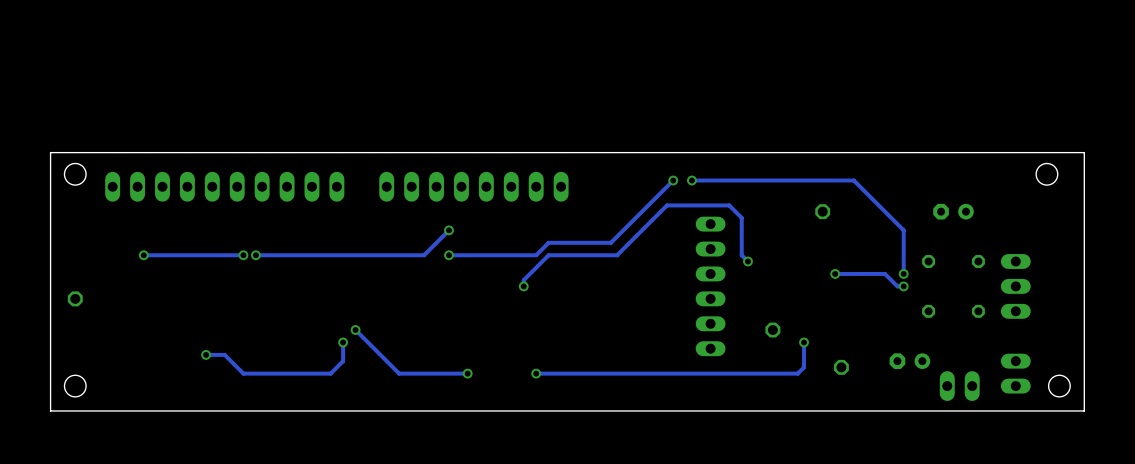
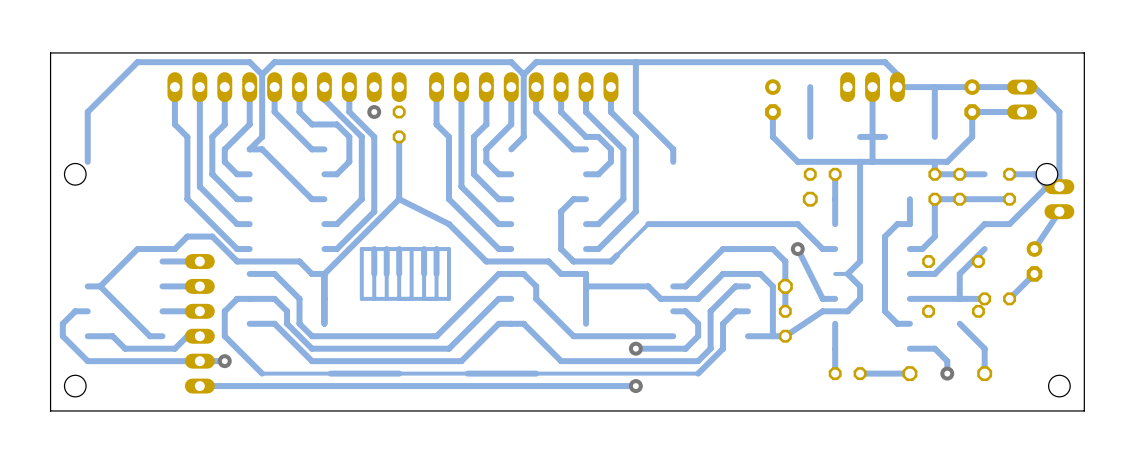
track: none -> (635, 62) (635, 112) (673, 149) (673, 161)
track: none -> (262, 74) (262, 136) (249, 149) (262, 149) (311, 199) (324, 199)
track: none -> (262, 74) (249, 62) (137, 62) (87, 112) (87, 161)
track: none -> (523, 74) (536, 62) (885, 62) (897, 74) (897, 87) (1034, 87) (1059, 112) (1059, 186) (1046, 186)
track: none -> (523, 74) (523, 136) (511, 149)
track: none -> (523, 74) (511, 62) (274, 62) (262, 74)
track: none -> (174, 87) (174, 124) (187, 136) (187, 199) (237, 249) (249, 249)
track: none -> (199, 87) (199, 186) (237, 224) (249, 224)
track: none -> (224, 87) (224, 124) (212, 136) (212, 174) (237, 199) (249, 199)
track: none -> (249, 87) (249, 124) (224, 149) (224, 161) (237, 174) (249, 174)
track: none -> (274, 87) (274, 112) (311, 149) (324, 149)
track: none -> (299, 87) (299, 112) (311, 124) (336, 124) (349, 136) (349, 161) (336, 174) (324, 174)
track: none -> (324, 87) (324, 99) (361, 136) (361, 199) (336, 224) (324, 224)
track: none -> (349, 87) (349, 112) (374, 136) (374, 211) (336, 249) (324, 249)
track: none -> (436, 87) (436, 124) (449, 136) (449, 199) (498, 249) (511, 249)
track: none -> (461, 87) (461, 186) (498, 224) (511, 224)
track: none -> (486, 87) (486, 124) (473, 136) (473, 174) (498, 199) (511, 199)
track: none -> (511, 87) (511, 124) (486, 149) (486, 161) (498, 174) (511, 174)
track: none -> (536, 87) (536, 112) (573, 149) (586, 149)
track: none -> (561, 87) (561, 112) (586, 136) (598, 136) (610, 149) (610, 161) (598, 174) (586, 174)
track: none -> (586, 87) (586, 112) (623, 149) (623, 199) (598, 224) (586, 224)
track: none -> (610, 87) (610, 112) (635, 136) (635, 211) (598, 249) (586, 249)
track: none -> (810, 87) (810, 136)
track: none -> (872, 87) (872, 161)
part: none -> (872, 87)
track: none -> (934, 87) (934, 136)
part: none -> (772, 99)
part: none -> (972, 99)
part: none -> (1022, 99)
via: none -> (374, 112)
track: none -> (1022, 112) (972, 112) (972, 136) (947, 161) (797, 161) (772, 136) (772, 112)
part: none -> (399, 124)
track: none -> (399, 136) (399, 199)
track: none -> (885, 136) (860, 136)
board edge: (1084, 152) (50, 152) -> (1084, 152) (1084, 52) (50, 52) (50, 152)
track: none -> (860, 161) (860, 261) (847, 273) (860, 286) (860, 298) (847, 311) (822, 311) (785, 336) (747, 336)
track: none -> (934, 161) (934, 174) (984, 174)
part: none -> (822, 174)
track: none -> (835, 174) (835, 224)
track: none -> (1009, 174) (1034, 174) (1046, 186)
track: (673, 180) (610, 242) (548, 242) (536, 255) (449, 255) -> none
via: (673, 180) -> none
track: (691, 180) (853, 180) (903, 230) (903, 273) -> none
via: (691, 180) -> none
part position: (224, 186) -> (287, 87)
part position: (473, 186) -> (523, 87)
part: none -> (934, 186)
part: none -> (959, 186)
part: none -> (1009, 186)
track: none -> (1046, 186) (1009, 224) (984, 224) (934, 273) (909, 273)
track: none -> (399, 199) (324, 273)
track: none -> (399, 199) (449, 224) (486, 261) (548, 261) (561, 273) (586, 273) (586, 323)
track: none -> (909, 199) (909, 224) (897, 224) (885, 236) (885, 311) (897, 323) (909, 323)
track: none -> (1009, 199) (934, 199) (934, 236) (922, 249) (909, 249)
part: none -> (1059, 199)
part position: (822, 211) -> (810, 199)
part: (953, 211) -> none
track: none -> (1059, 211) (1034, 249)
track: (648, 224) (667, 205) (729, 205) (741, 217) (741, 255) (747, 261) -> (648, 224) (797, 224) (822, 249) (835, 249)
track: (449, 230) (424, 255) (255, 255) -> none
via: (449, 230) -> none
track: none -> (411, 249) (411, 298)
track: none -> (449, 249) (361, 249) (361, 298) (449, 298) (449, 249)
track: none -> (797, 249) (822, 298) (835, 298)
via: none -> (797, 249)
track: none -> (984, 249) (959, 273) (959, 298)
via: (143, 255) -> none
track: (243, 255) (143, 255) -> none
via: (243, 255) -> none
via: (255, 255) -> none
via: (449, 255) -> none
track: (617, 255) (548, 255) (523, 280) (523, 286) -> (617, 255) (610, 261) (573, 261) (561, 249) (561, 211) (573, 199) (586, 199)
track: none -> (199, 261) (162, 261)
via: (747, 261) -> none
part: none -> (1034, 261)
track: none -> (249, 273) (274, 273) (299, 298) (299, 323) (311, 336) (436, 336) (498, 273) (523, 273) (536, 286) (536, 298) (573, 336) (673, 336)
track: none -> (324, 273) (324, 323)
track: none -> (324, 273) (311, 273) (299, 261) (237, 261) (212, 236) (187, 236) (174, 249) (137, 249) (100, 286)
track: none -> (374, 273) (374, 249) (374, 298)
track: none -> (386, 273) (386, 249) (386, 298)
track: none -> (399, 273) (399, 249) (399, 298)
track: none -> (424, 273) (424, 249) (424, 298)
track: none -> (436, 273) (436, 249) (436, 298)
via: (835, 273) -> none
track: (847, 273) (885, 273) (897, 286) (903, 286) -> none
via: (903, 273) -> none
track: none -> (1034, 273) (1009, 298)
track: none -> (100, 286) (87, 286)
track: none -> (100, 286) (150, 336) (162, 336)
track: none -> (199, 286) (162, 286)
via: (523, 286) -> none
track: none -> (586, 286) (648, 286) (660, 298) (698, 298) (723, 273) (760, 273) (772, 286) (772, 336)
track: none -> (673, 286) (685, 286) (723, 249) (772, 249) (785, 261) (785, 311)
part: (710, 286) -> none
track: none -> (747, 286) (735, 286) (710, 311) (710, 348) (698, 361) (561, 361) (523, 323) (498, 323) (461, 361) (311, 361) (274, 323) (249, 323)
part: none -> (785, 286)
via: (903, 286) -> none
part: (1015, 286) -> none
part: (75, 298) -> none
track: none -> (984, 298) (909, 298)
part: none -> (997, 298)
track: none -> (87, 311) (75, 311) (62, 323) (62, 336) (87, 361) (224, 361)
track: none -> (199, 311) (162, 311)
track: none -> (673, 311) (685, 311) (698, 323) (698, 336) (685, 348) (635, 348)
part: none -> (199, 323)
part: none -> (785, 323)
track: none -> (835, 323) (835, 373)
track: none -> (959, 323) (984, 348) (984, 373)
track: (355, 330) (399, 373) -> (330, 373) (399, 373)
via: (355, 330) -> none
part: (772, 330) -> none
track: none -> (199, 336) (187, 336) (174, 348) (125, 348) (112, 336) (87, 336)
track: (343, 342) (343, 361) (330, 373) -> none
via: (343, 342) -> none
track: (804, 342) (804, 367) (797, 373) (698, 373) -> (747, 311) (735, 311) (723, 323) (723, 348) (698, 373)
via: (804, 342) -> none
via: none -> (635, 348)
track: none -> (909, 348) (934, 348) (947, 361) (947, 373)
track: (206, 354) (224, 354) (243, 373) (262, 373) -> (511, 298) (498, 298) (449, 348) (311, 348) (287, 323) (287, 311) (274, 298) (237, 298) (224, 311) (224, 336) (262, 373)
via: (206, 354) -> none
part footprint: [833, 359, 849, 375] -> [828, 367, 867, 381]
via: none -> (224, 361)
part: (909, 361) -> none
via: (467, 373) -> none
track: none -> (536, 373) (467, 373)
via: (536, 373) -> none
track: none -> (909, 373) (860, 373)
part: none -> (909, 373)
via: none -> (947, 373)
part: none -> (984, 373)
part: (1015, 373) -> none
track: none -> (635, 386) (199, 386)
via: none -> (635, 386)
part: (959, 386) -> none

